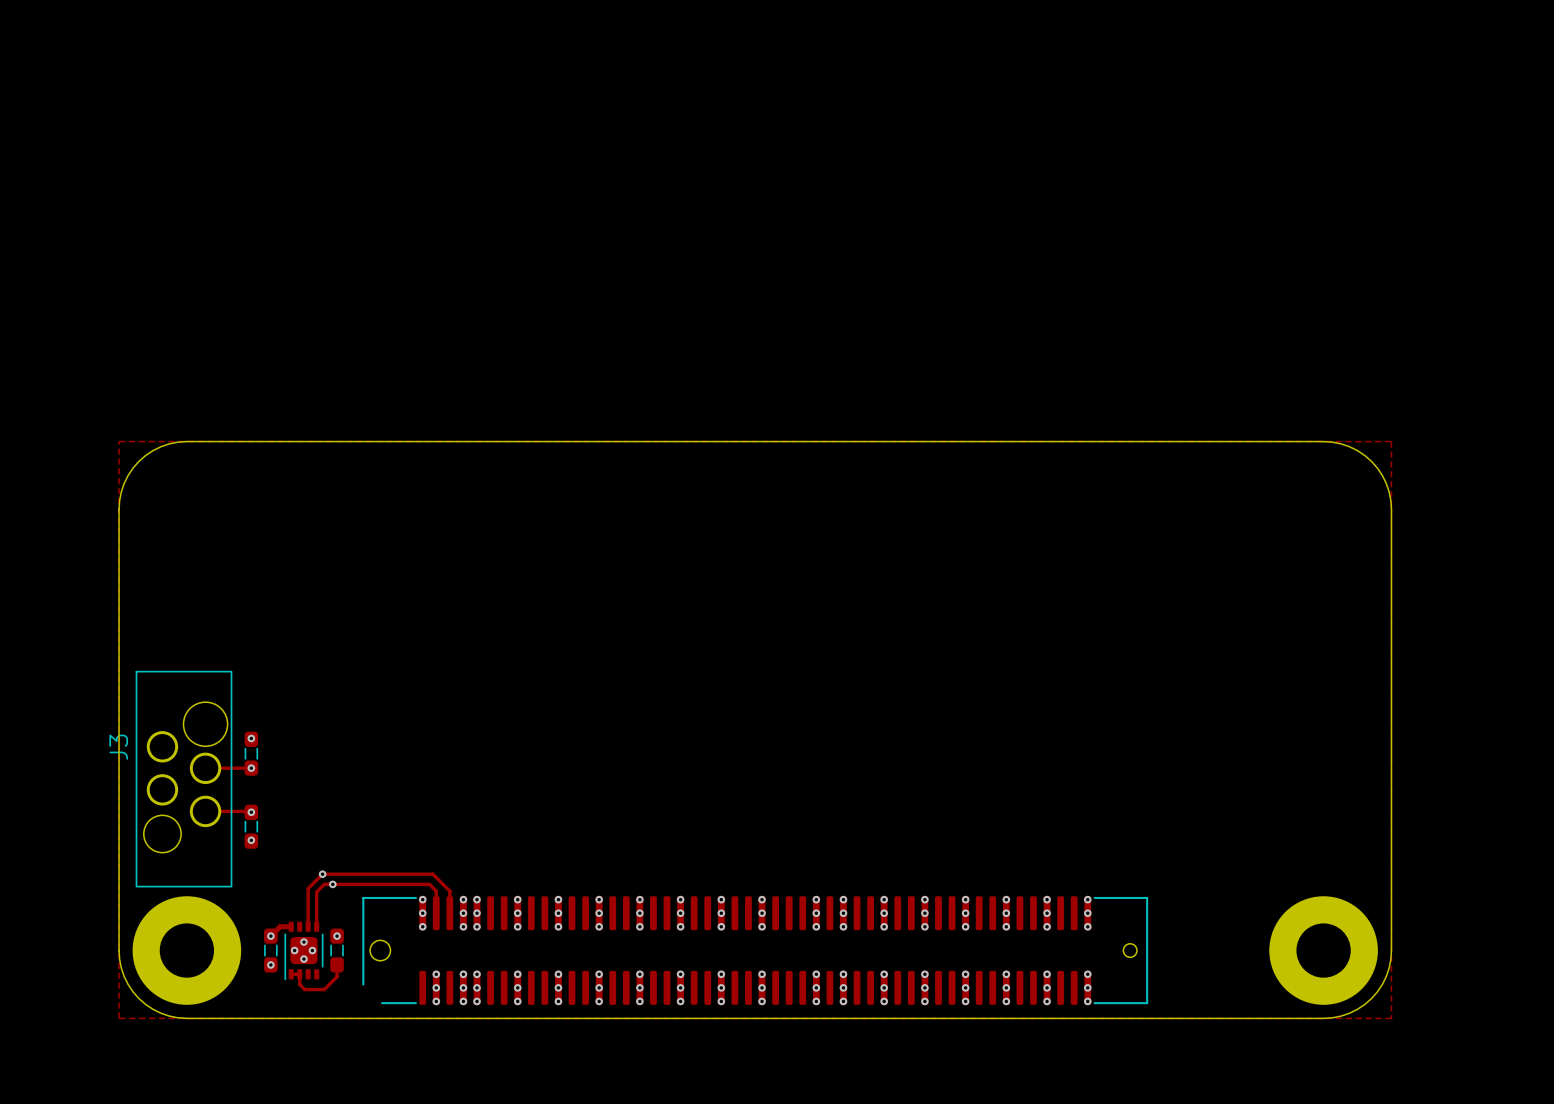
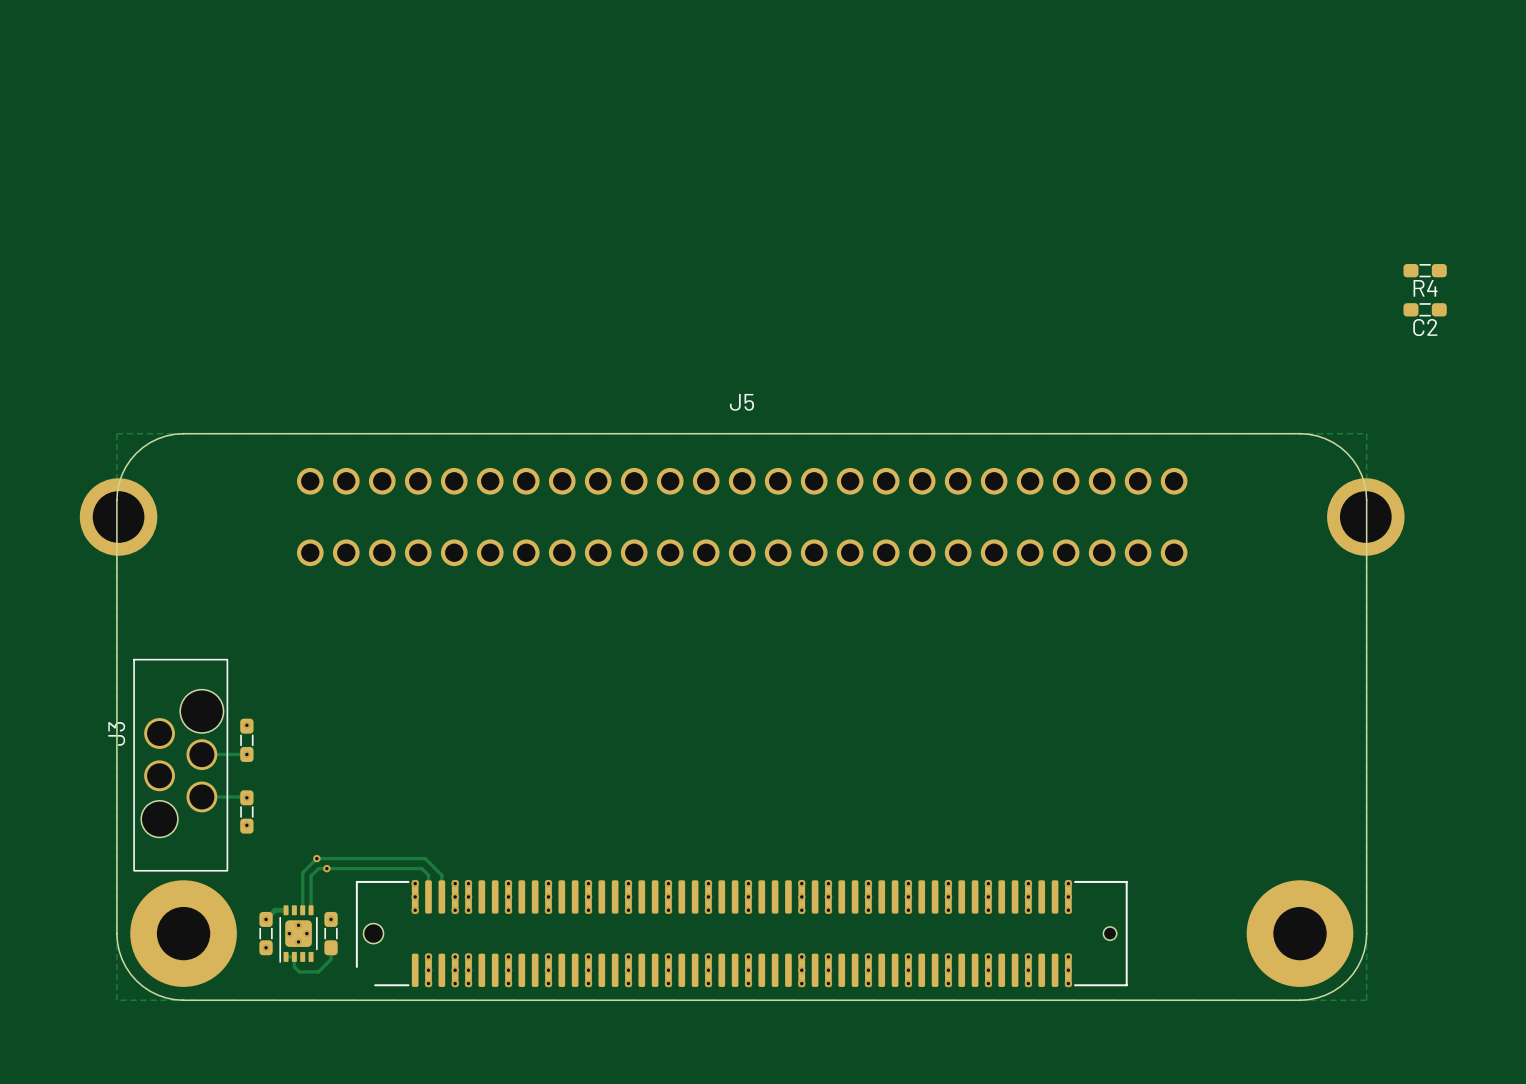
R4: none -> (1425, 270)
C2: none -> (1425, 309)
J5: none -> (742, 517)

